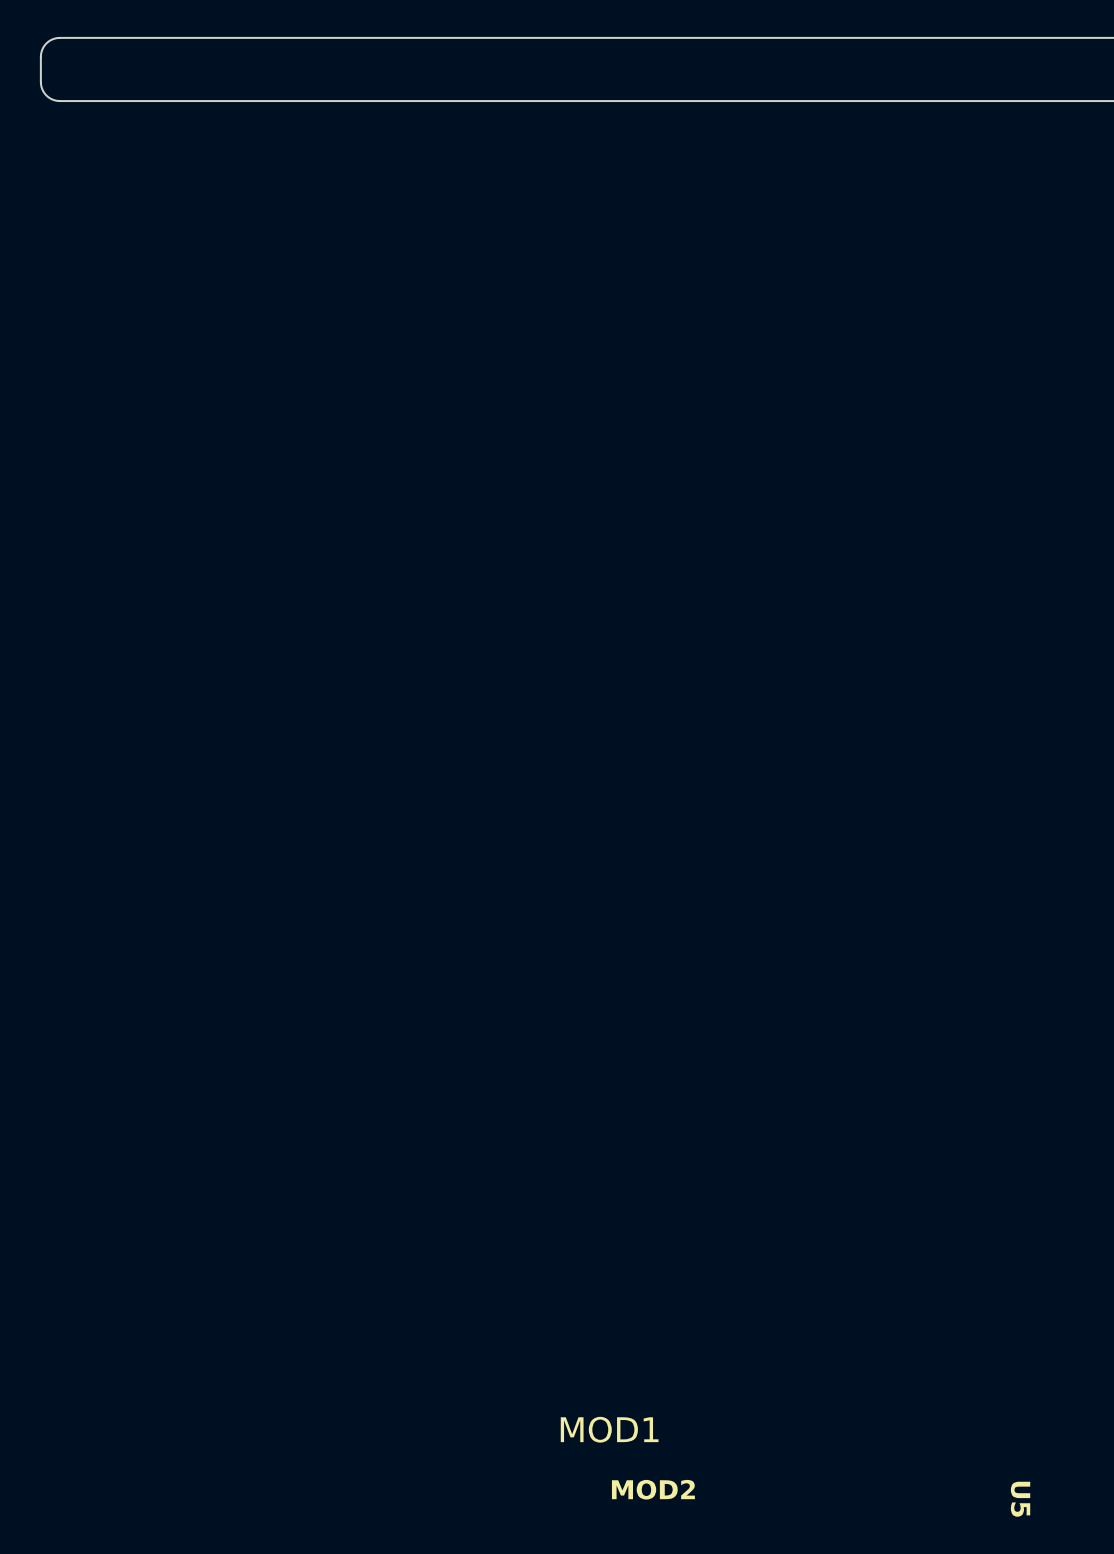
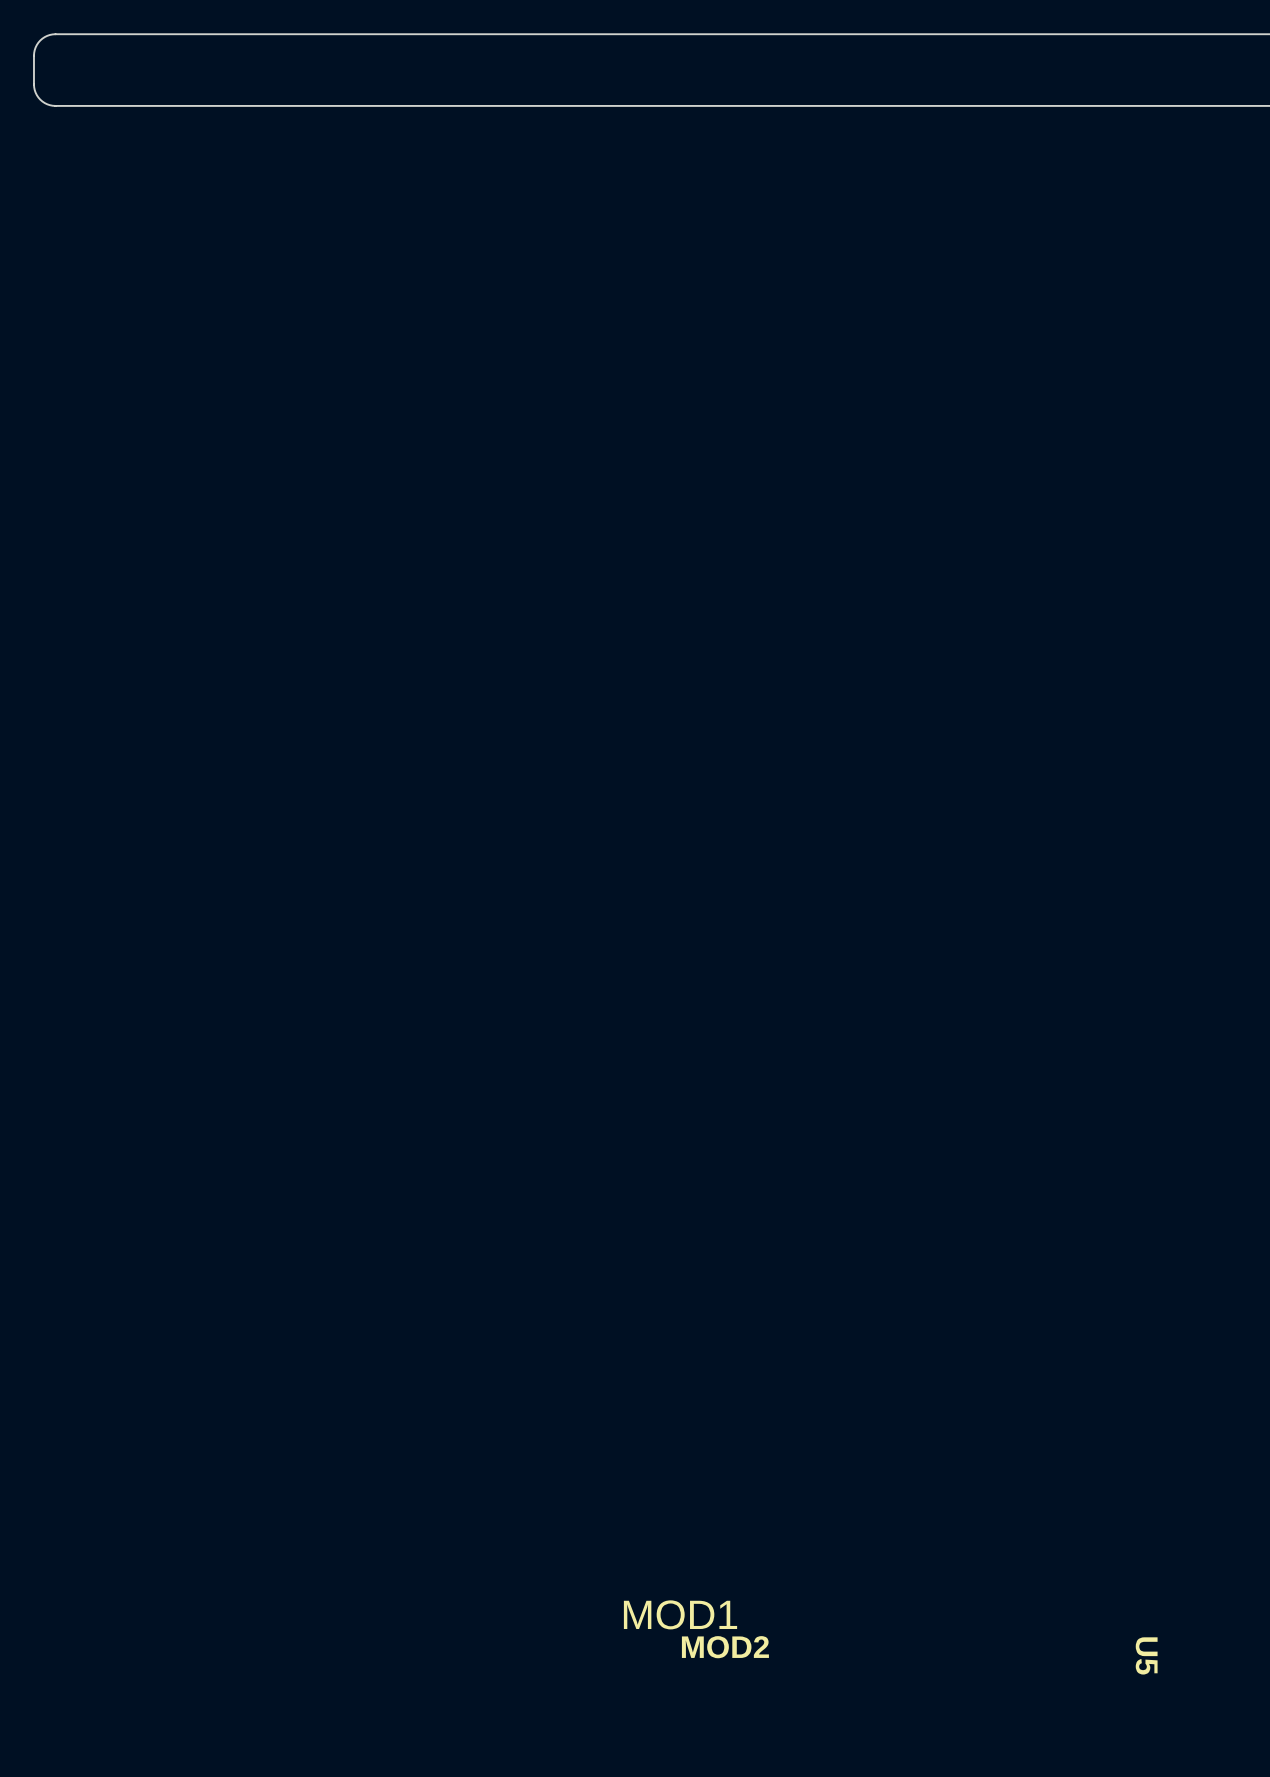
MOD2 position: (653, 1489) -> (725, 1647)
U5 position: (1020, 1499) -> (1146, 1655)

